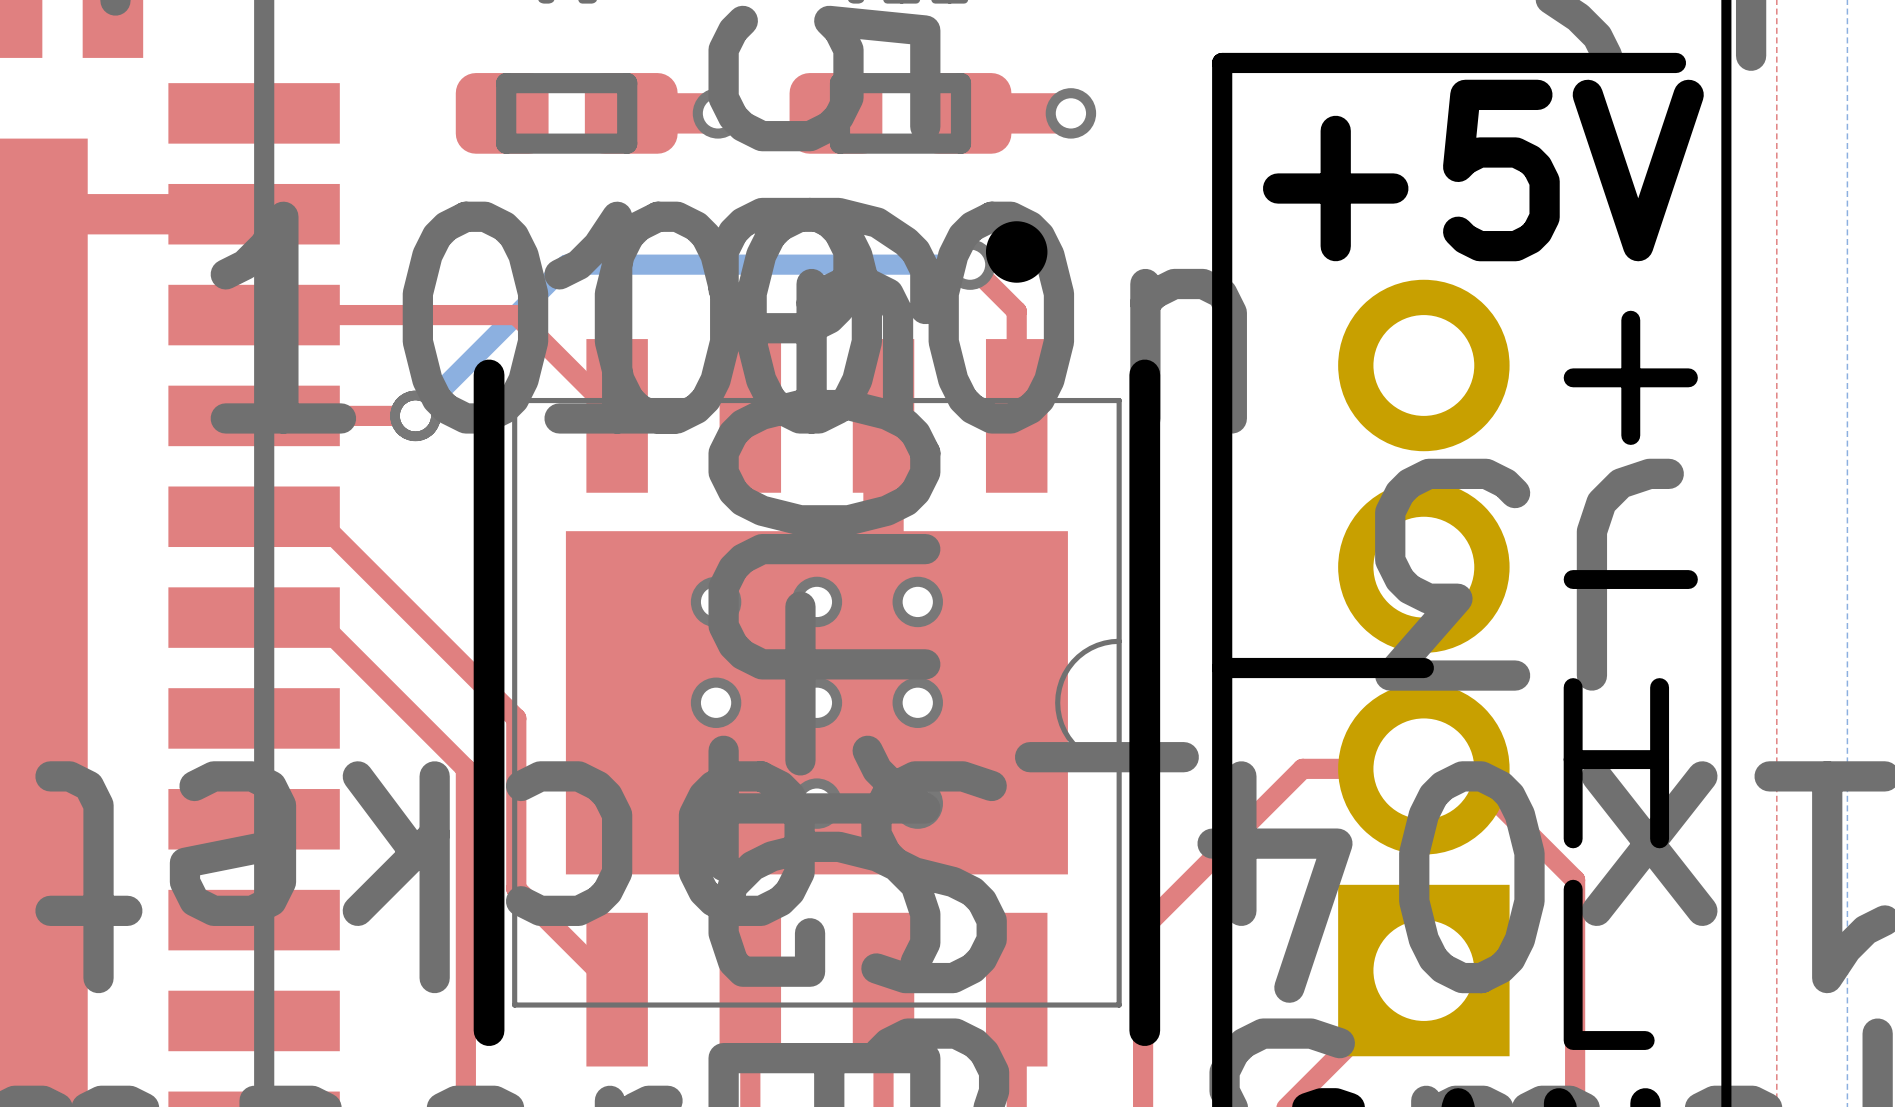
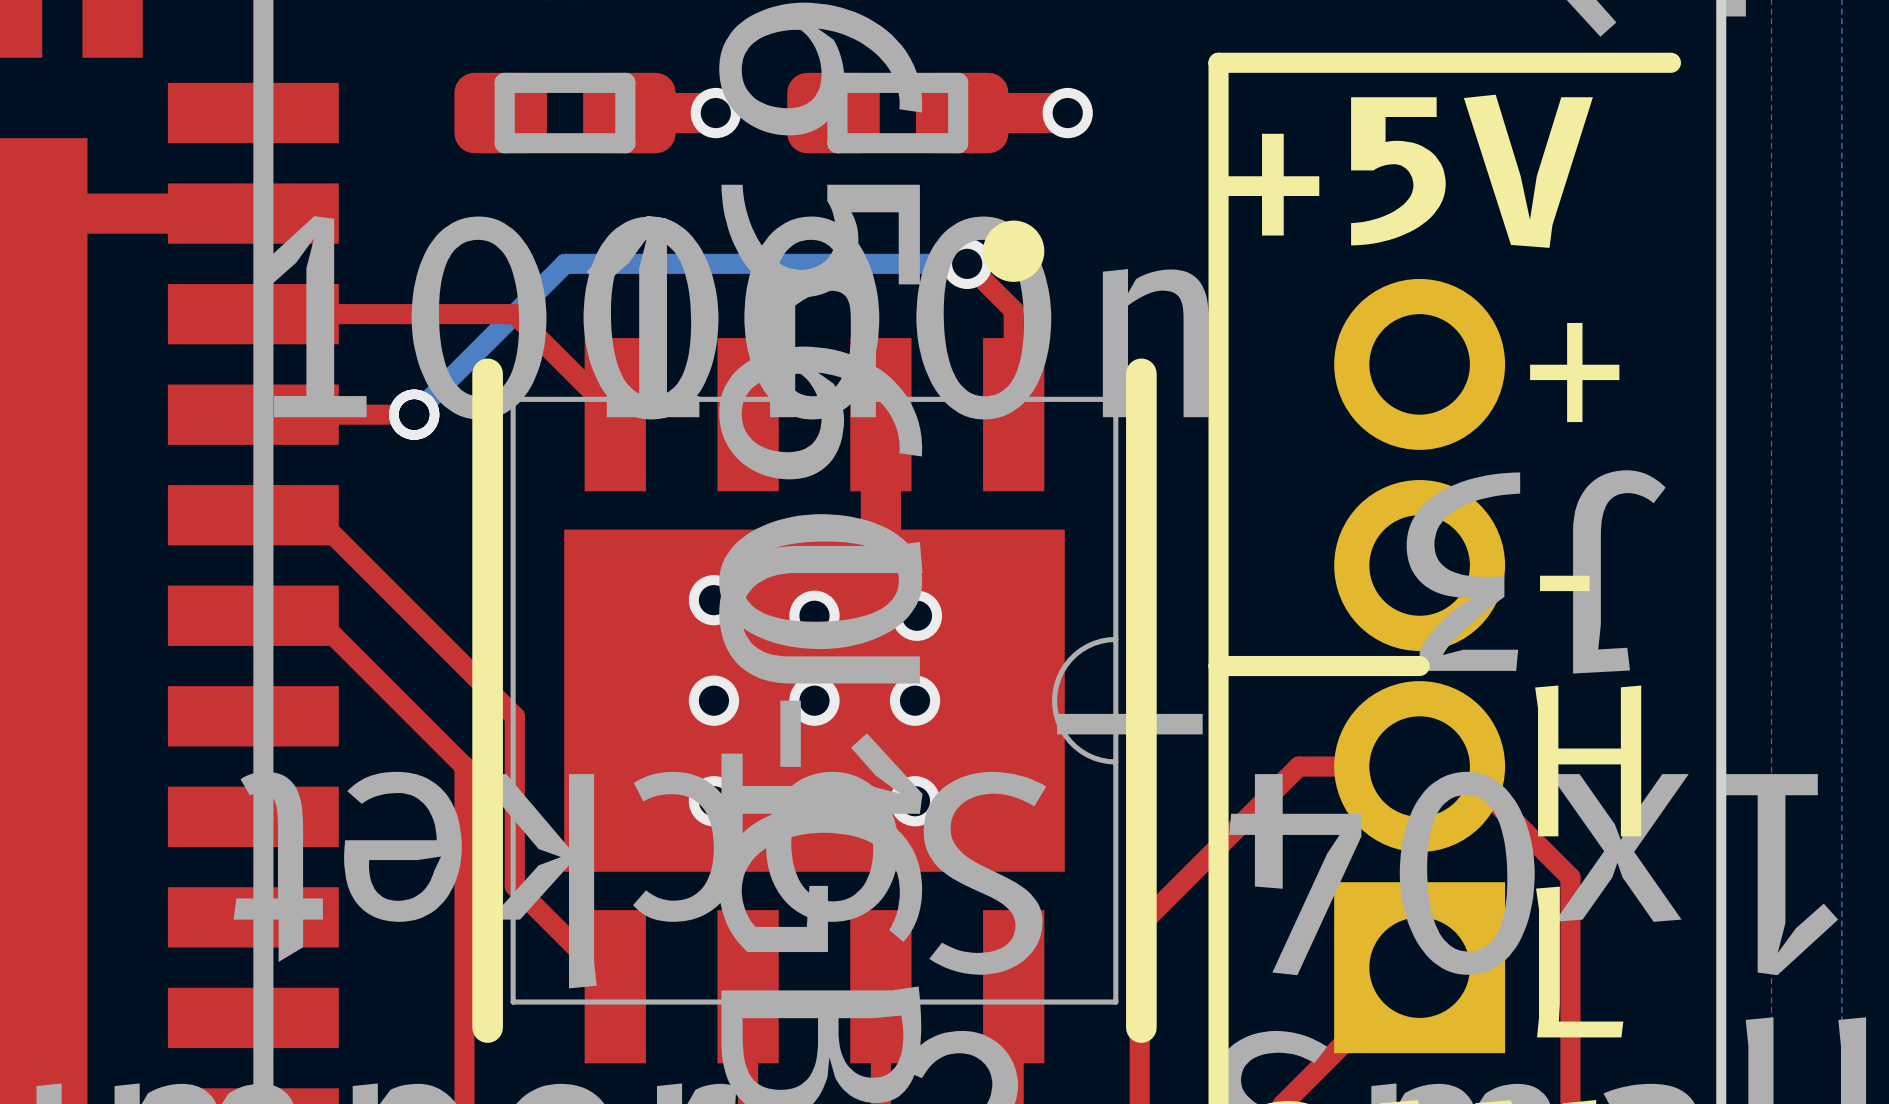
via position: (816, 601) -> (814, 615)
via position: (917, 601) -> (916, 615)

